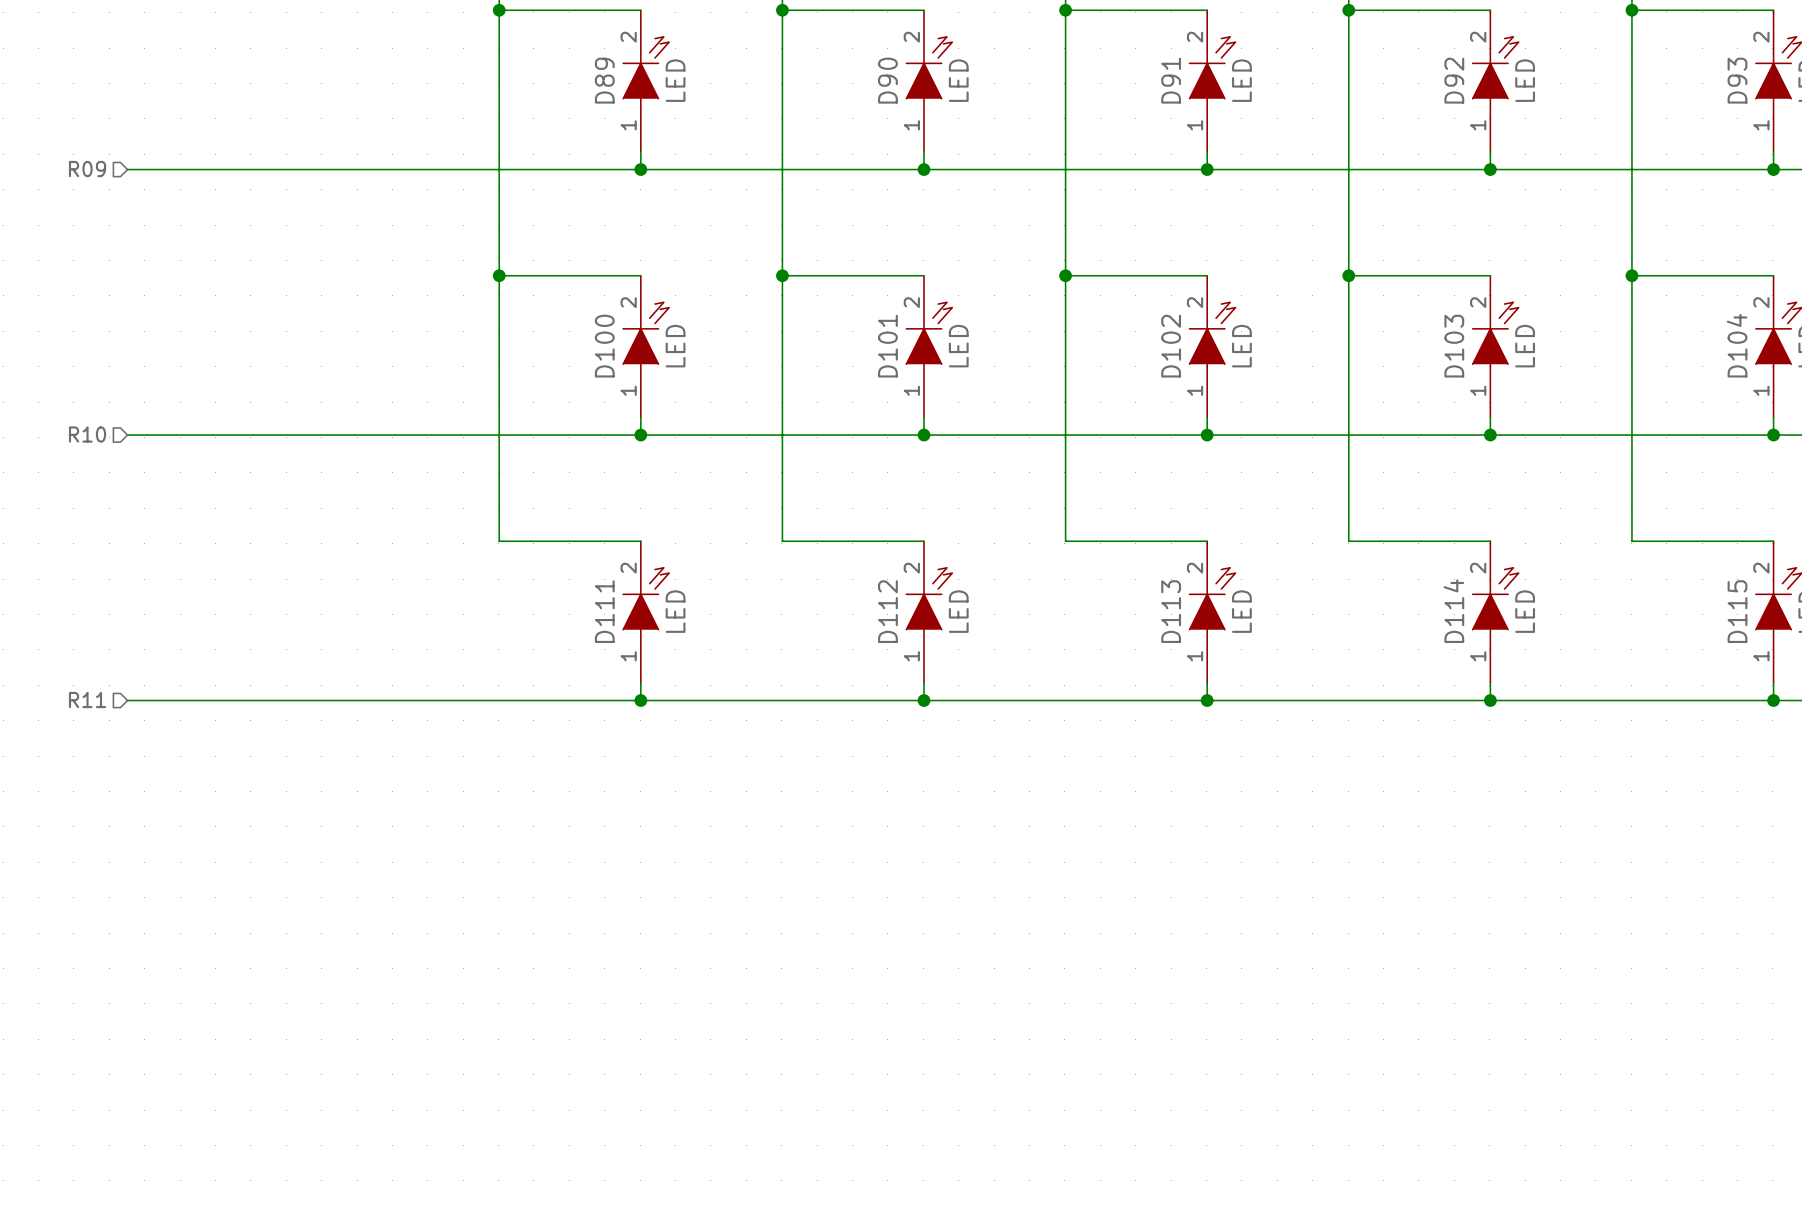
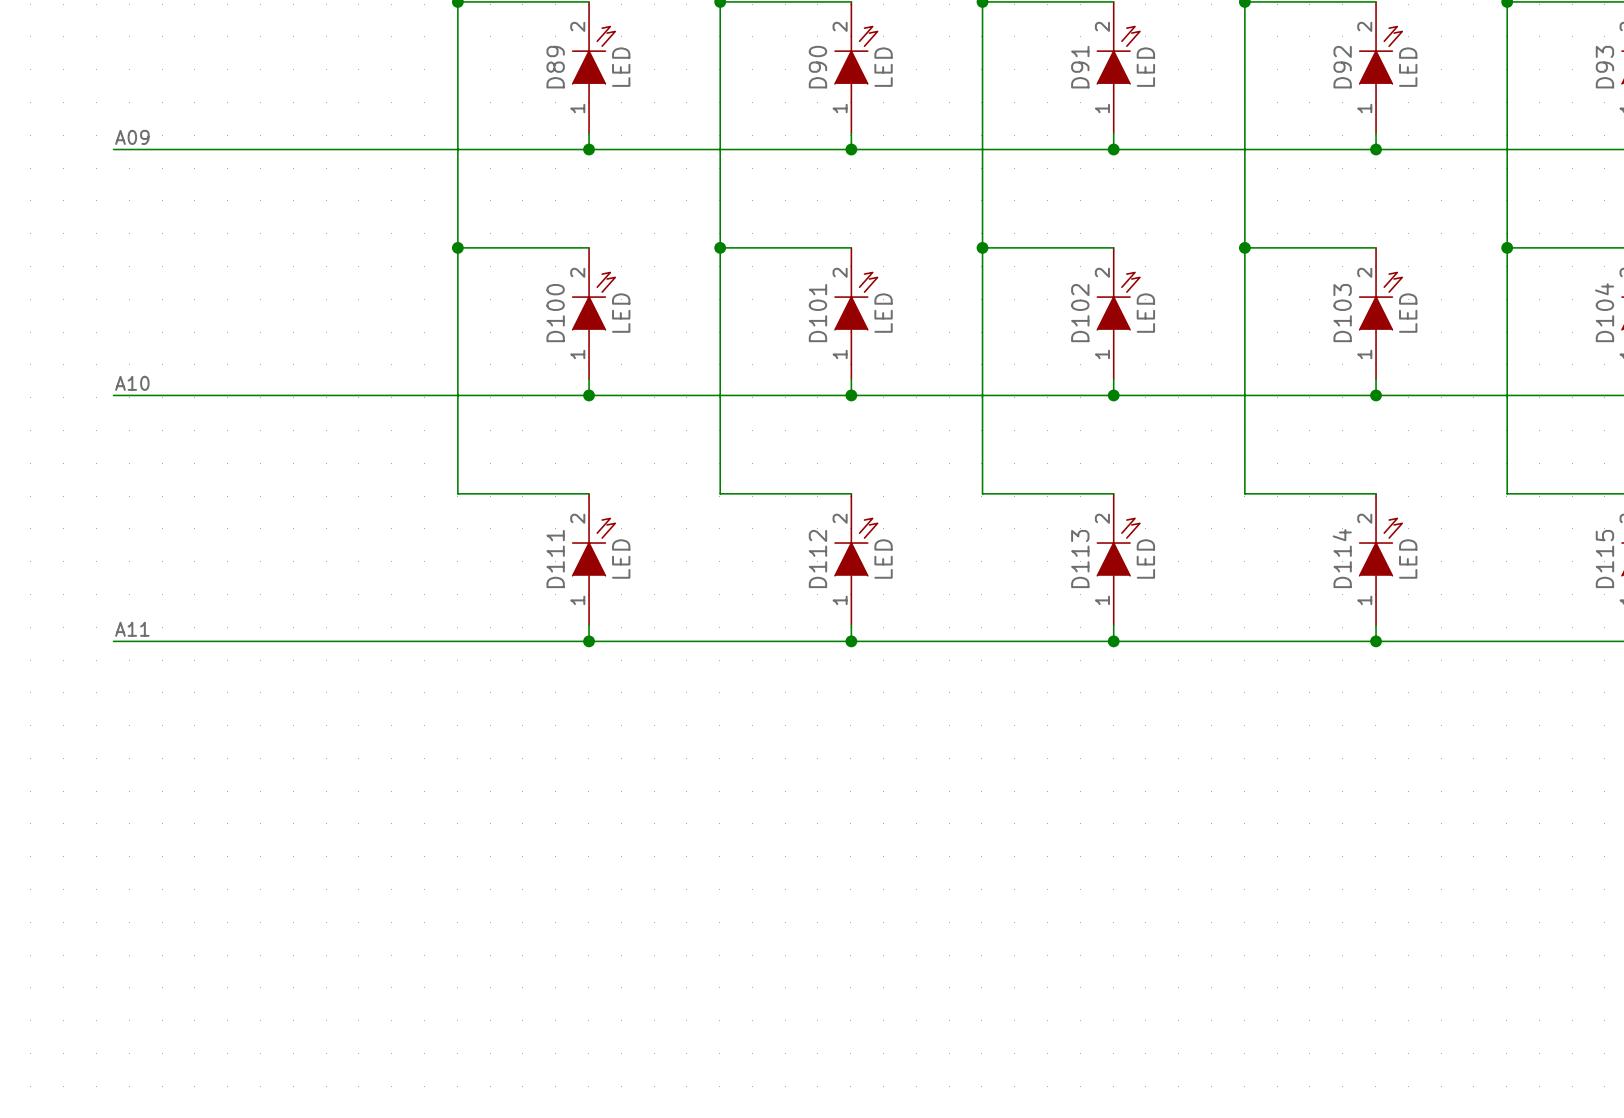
label: none -> A09 (132, 137)
hierarchical label: R09 (87, 169) -> none
label: none -> A10 (132, 383)
hierarchical label: R10 (87, 434) -> none
label: none -> A11 (132, 629)
hierarchical label: R11 (87, 700) -> none

